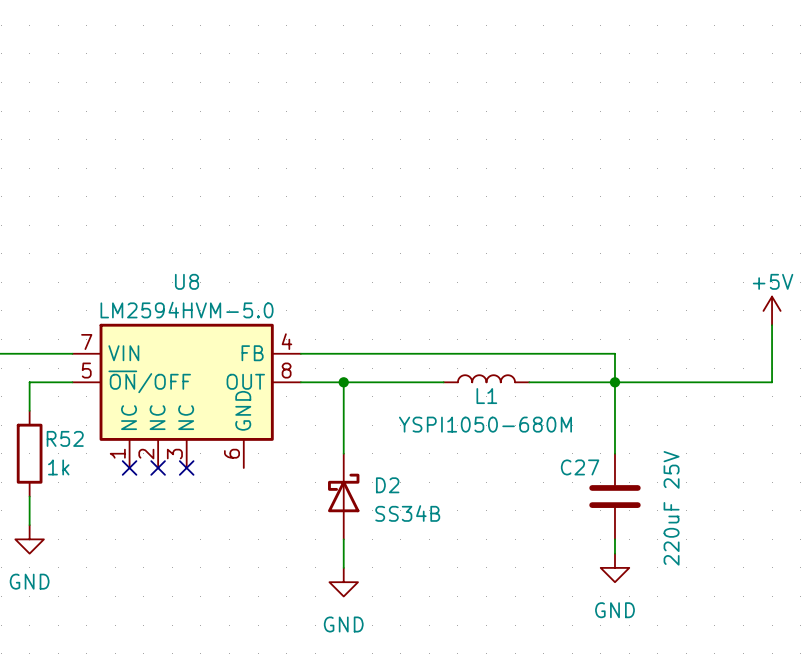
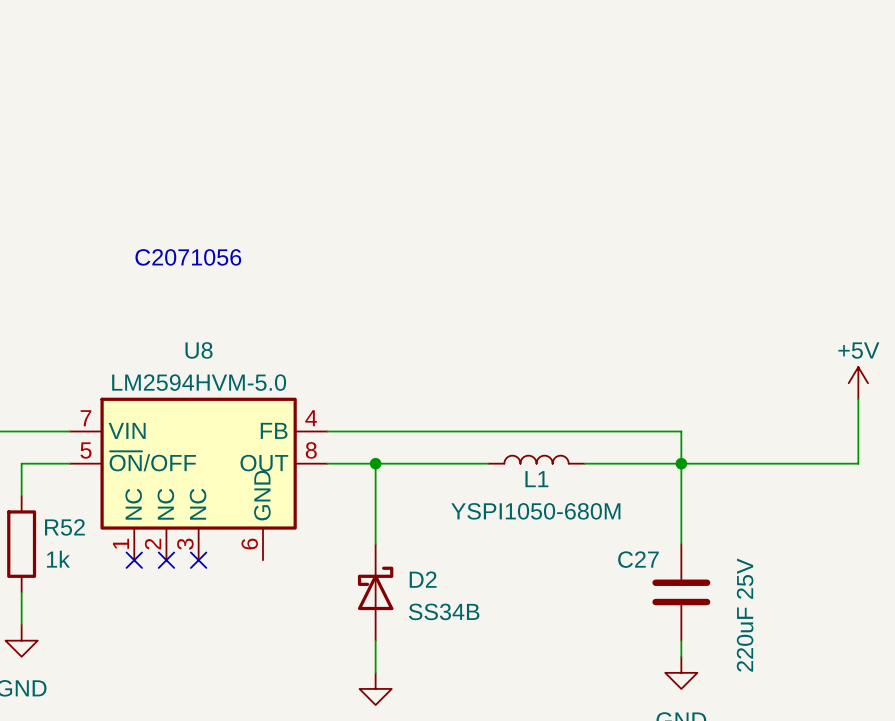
text: none -> C2071056 (188, 257)

